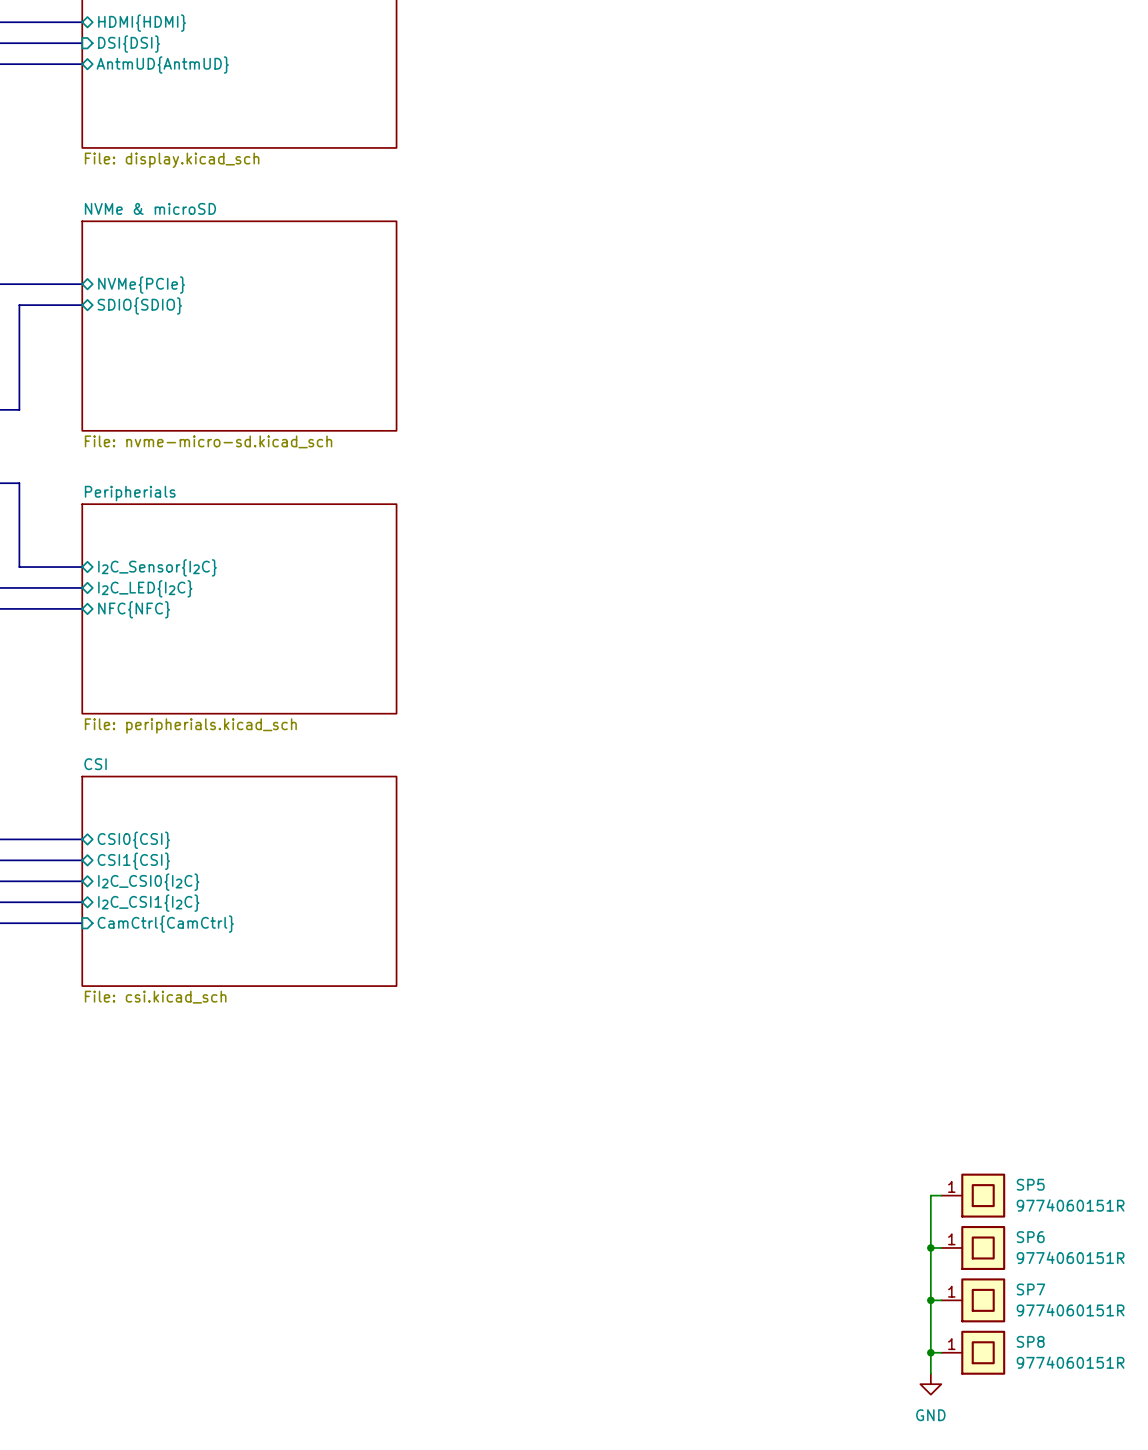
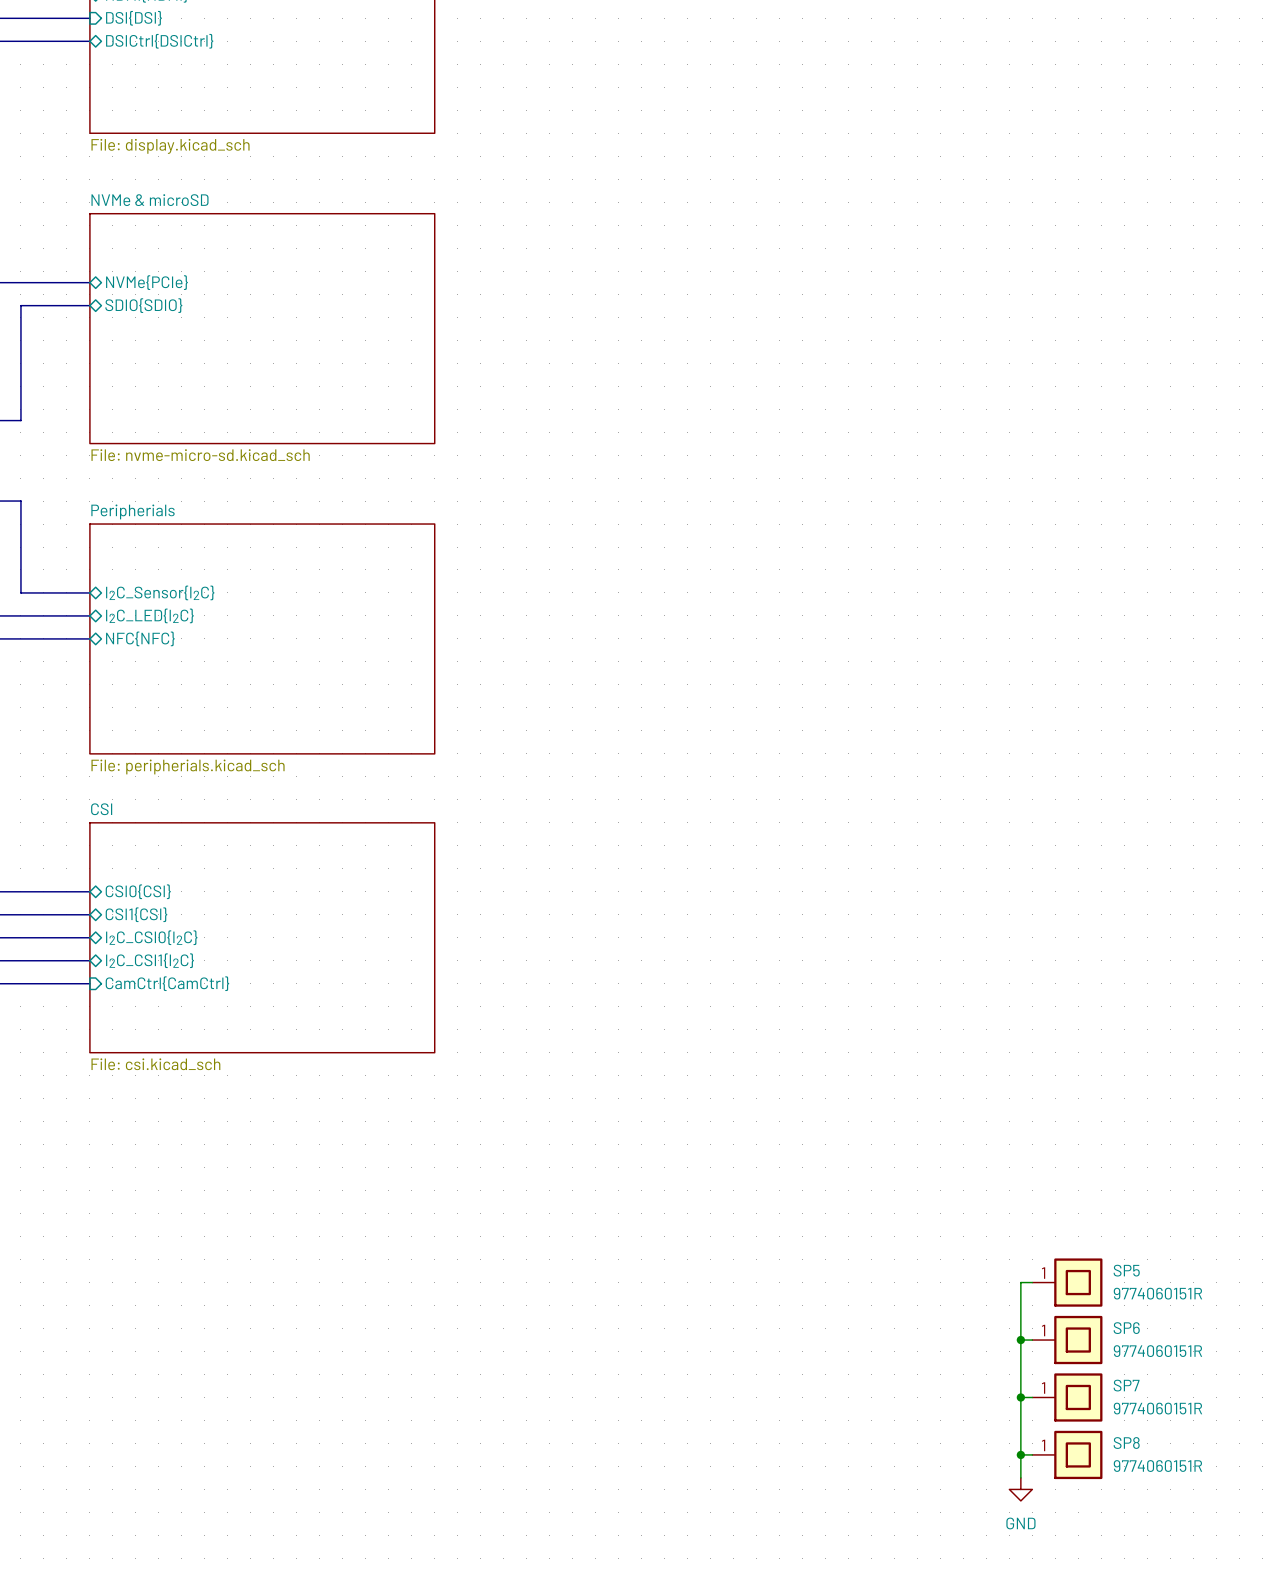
sheet pin: AntmUD{AntmUD} (162, 65) -> DSICtrl{DSICtrl} (159, 41)

